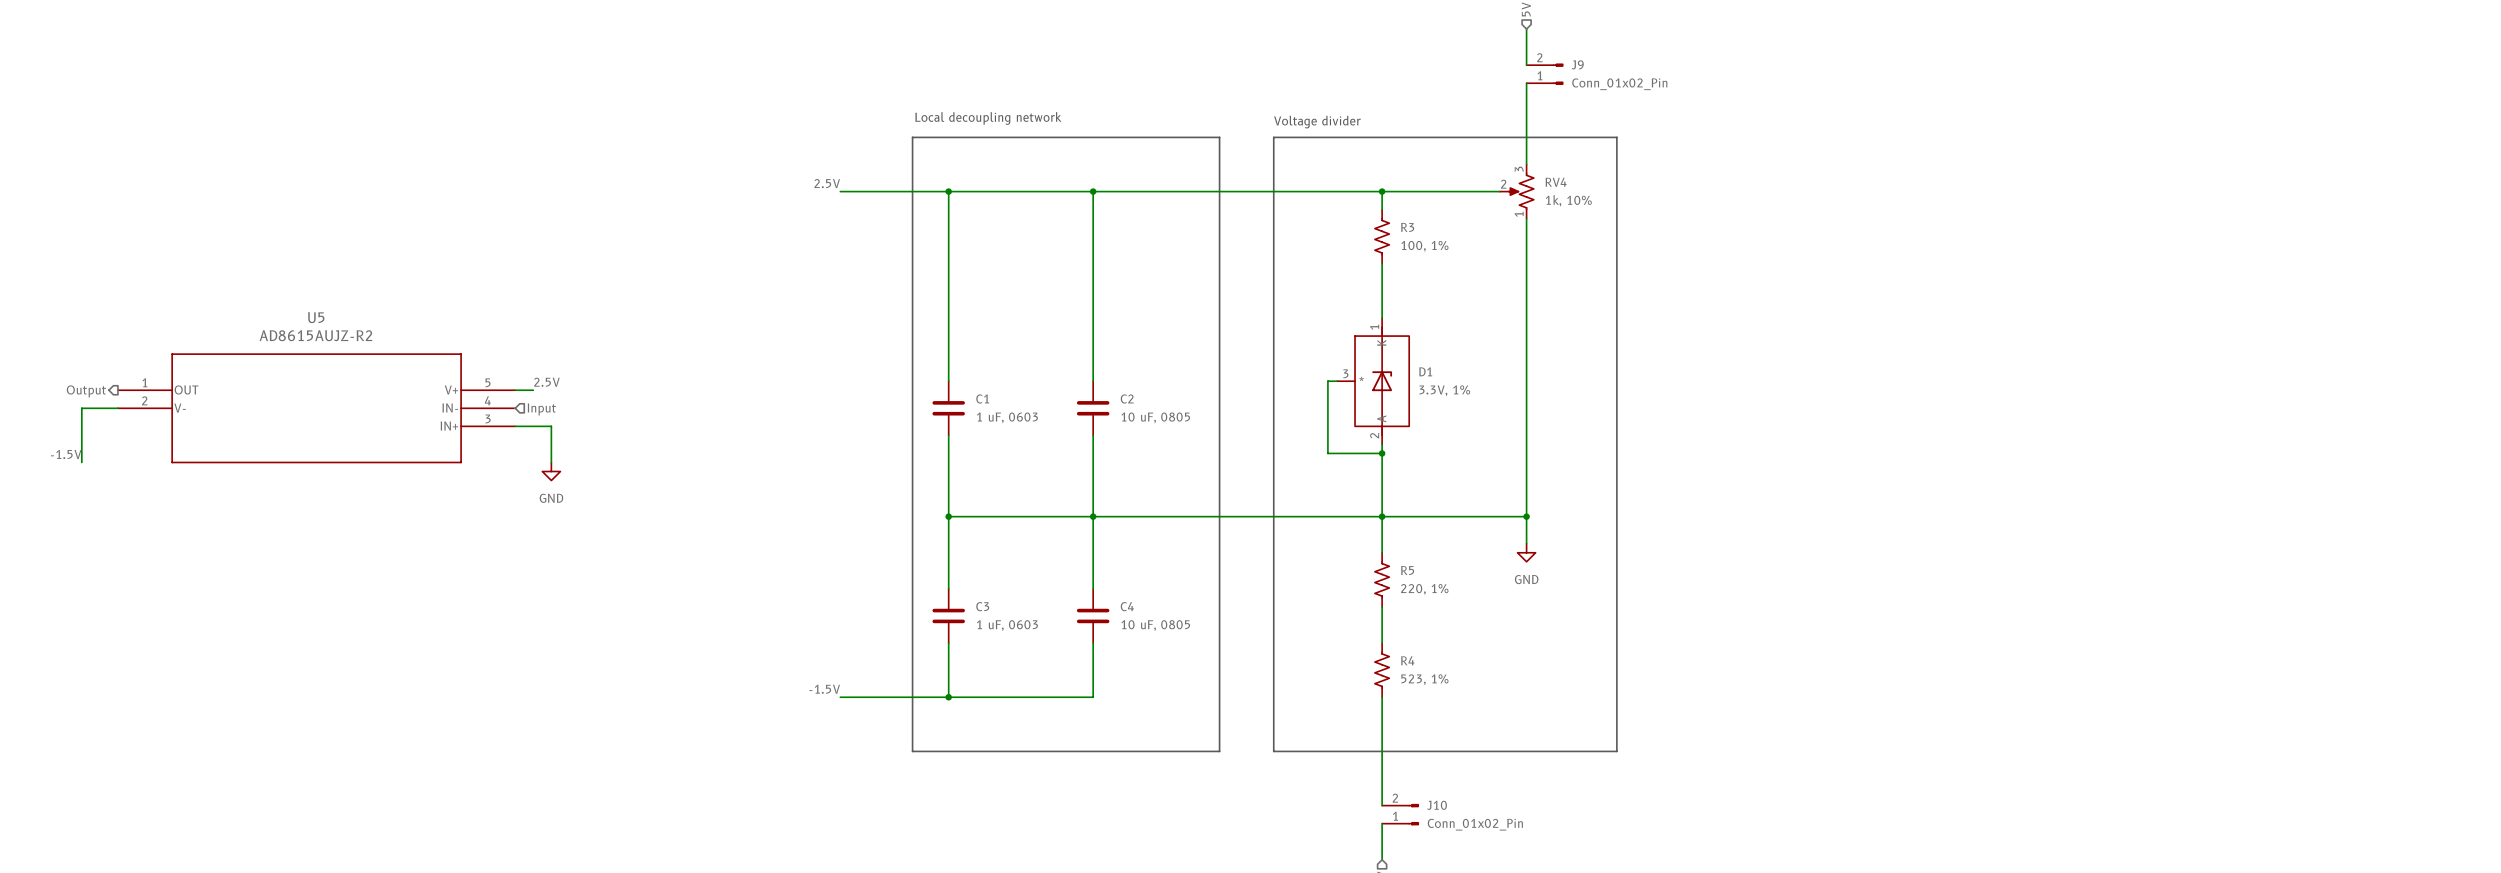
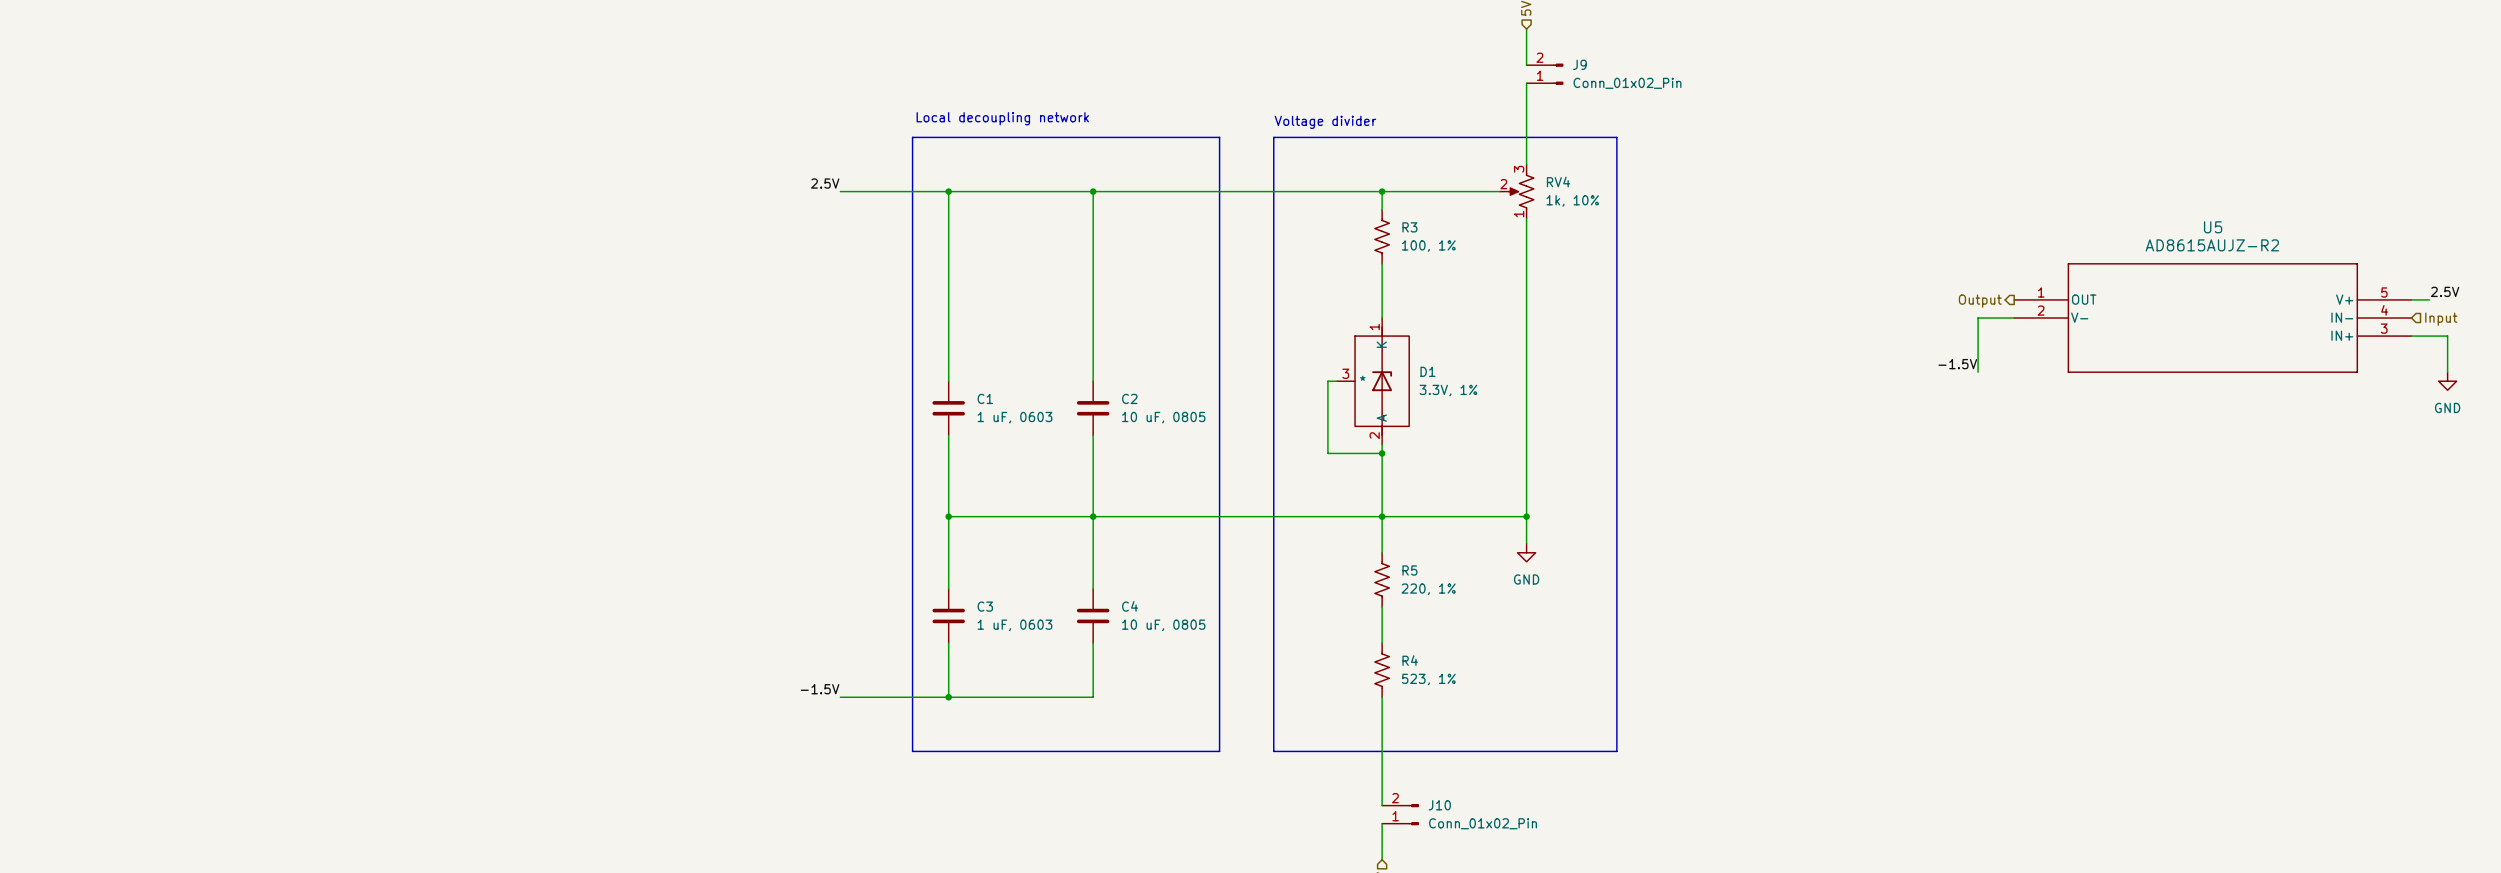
label: none -> 2.5V (2445, 291)
wire: none -> (2411, 299) (2429, 299)
hierarchical label: none -> Output (1980, 301)
wire: none -> (2014, 318) (1978, 318) (1978, 372)
hierarchical label: none -> Input (2441, 319)
wire: none -> (2411, 336) (2447, 336) (2447, 372)
label: none -> -1.5V (1957, 364)
power symbol: none -> GND (2447, 381)
label: 2.5V (546, 382) -> none
wire: (515, 390) (533, 390) -> none
hierarchical label: Output (86, 391) -> none
wire: (117, 408) (81, 408) (81, 462) -> none
U5 position: (316, 408) -> (2212, 318)
hierarchical label: Input (541, 409) -> none
wire: (515, 426) (551, 426) (551, 462) -> none
label: -1.5V (66, 454) -> none
power symbol: GND (551, 471) -> none

